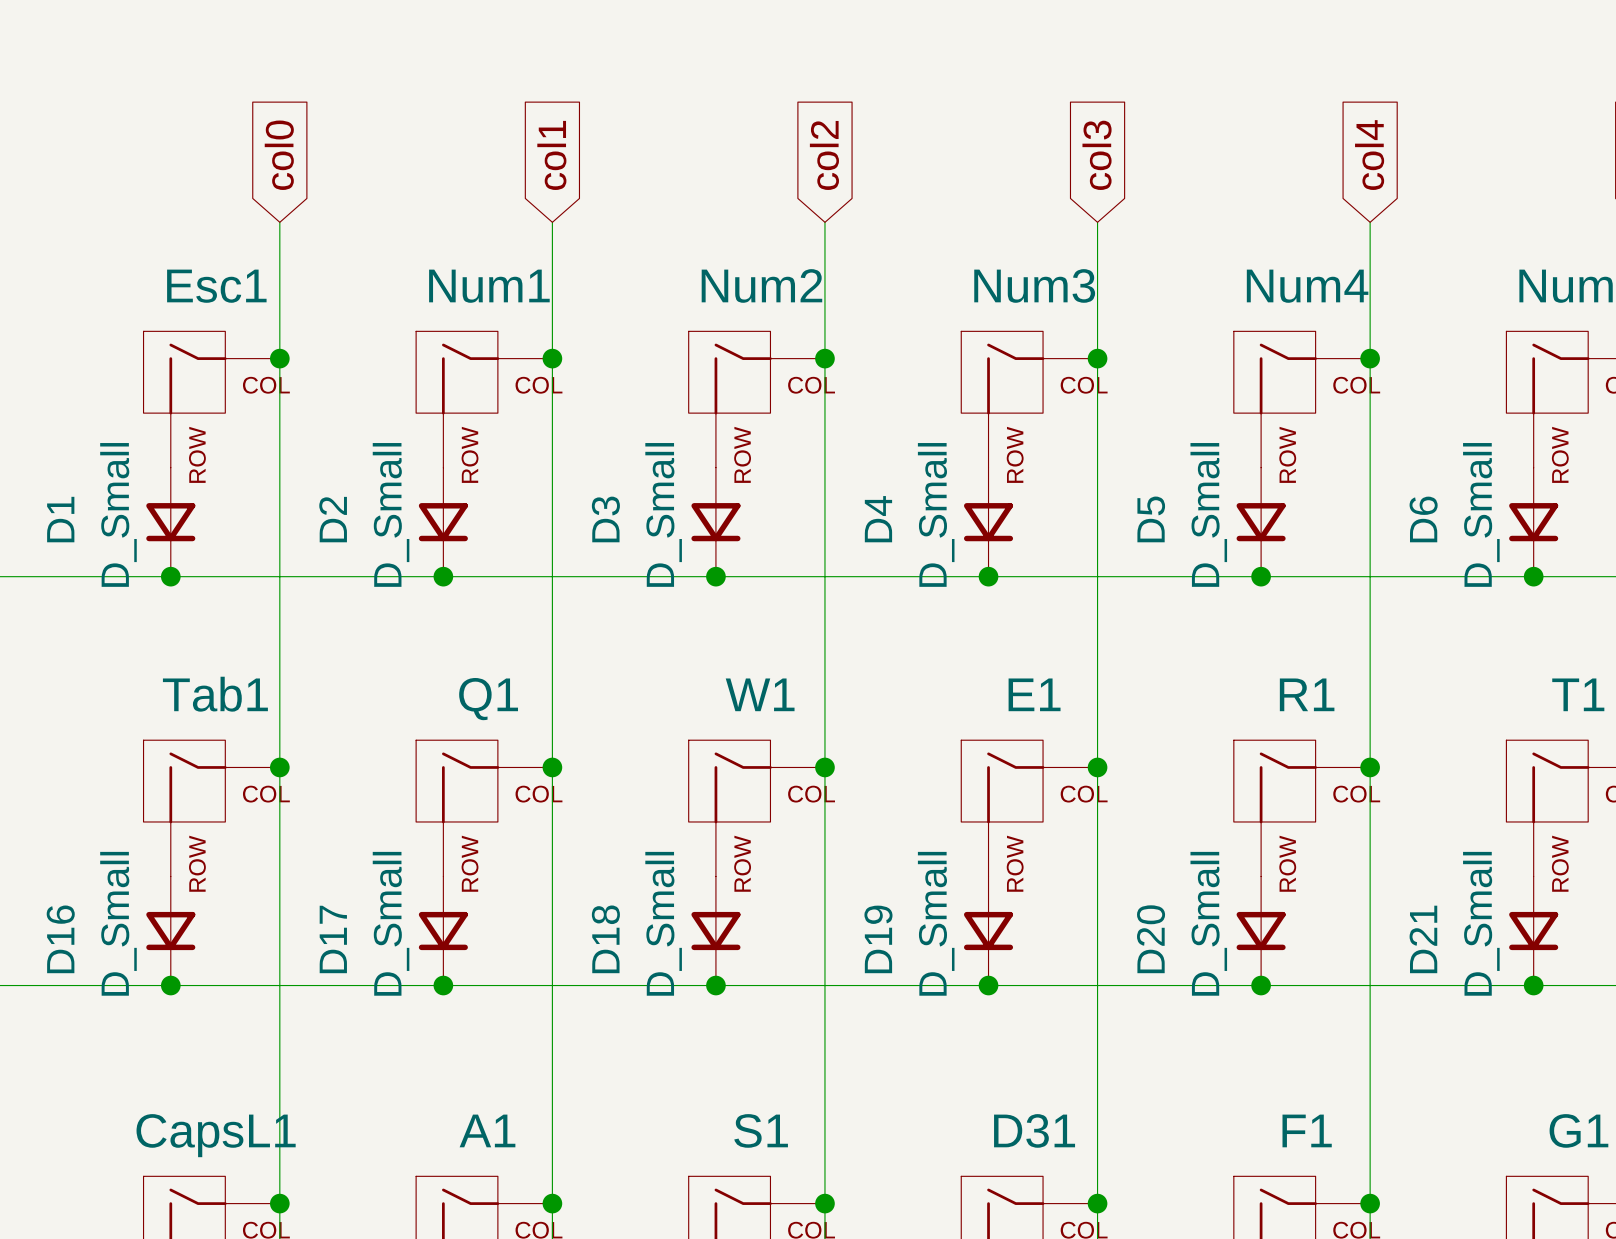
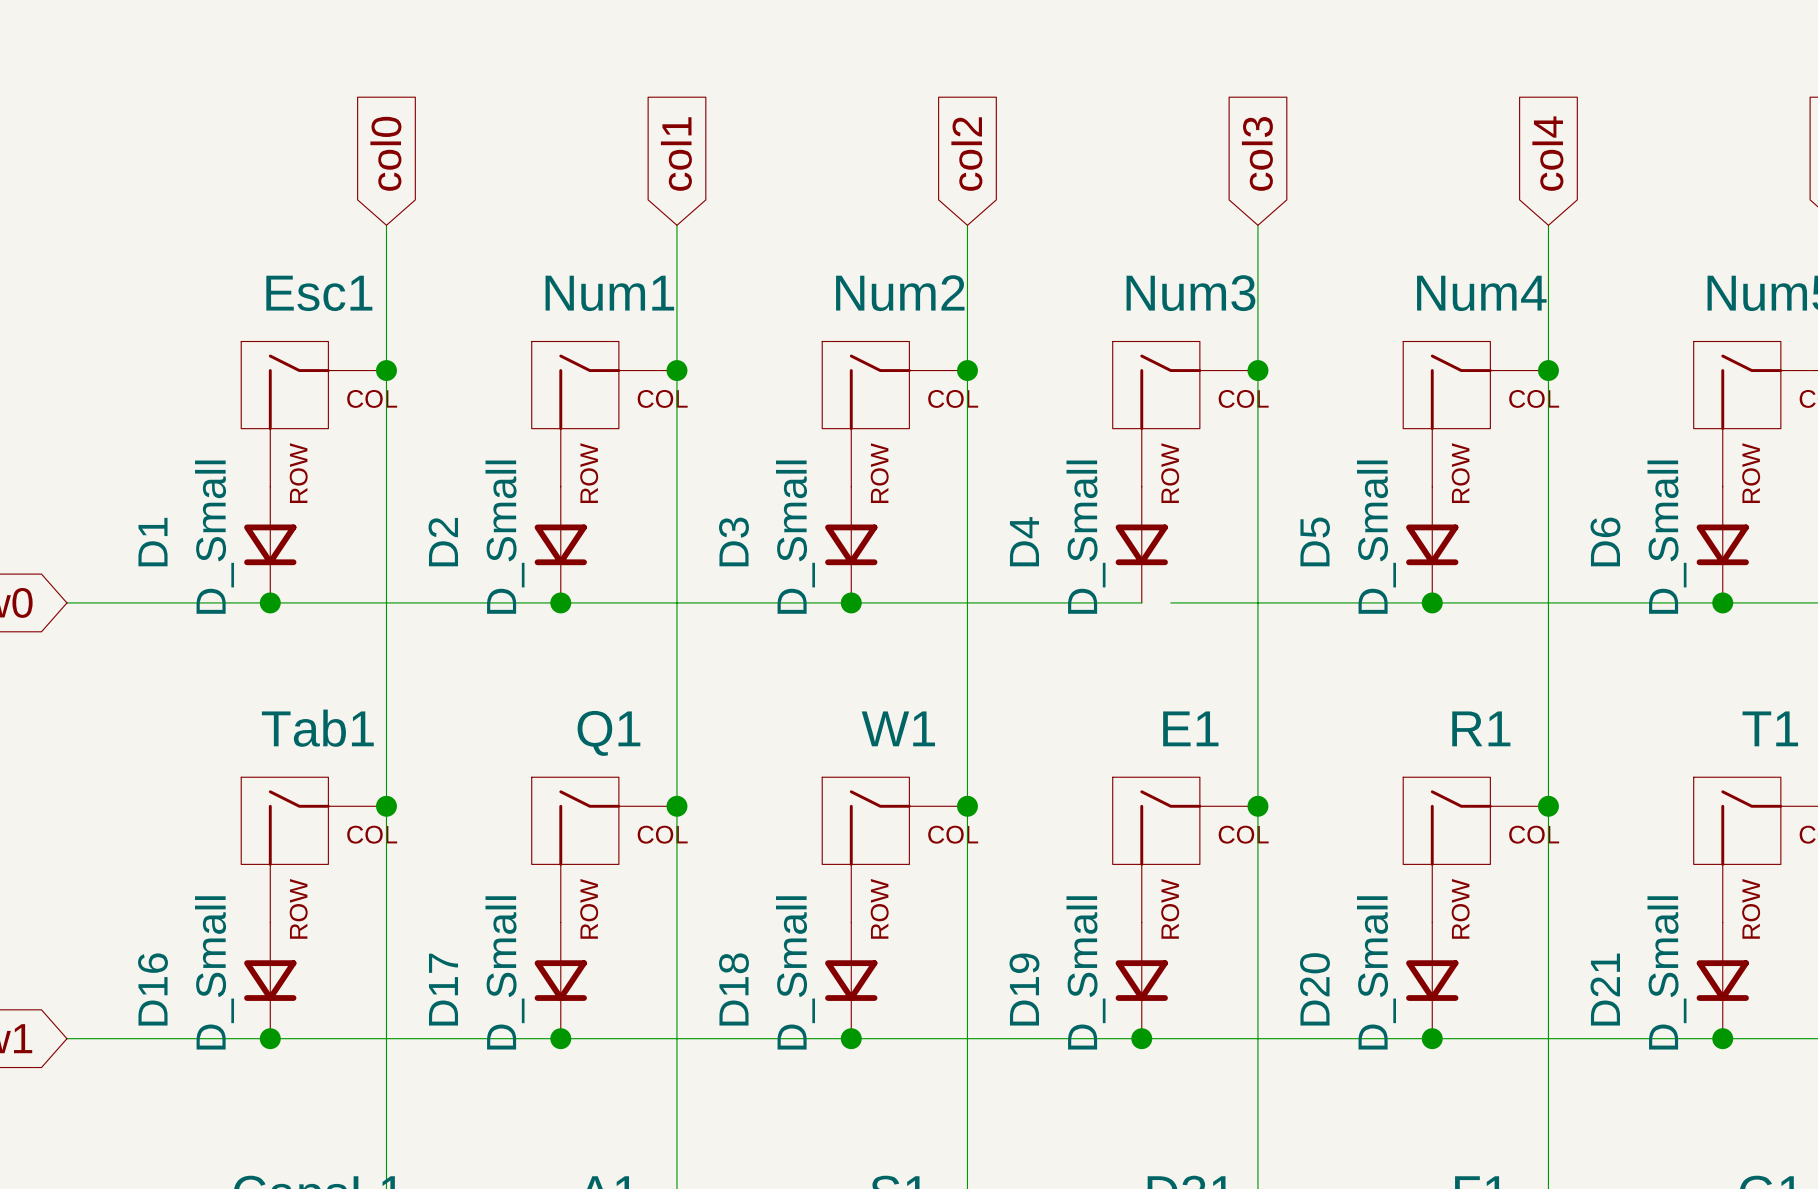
wire: (988, 576) (1015, 576) -> none
junction: (988, 576) -> none

